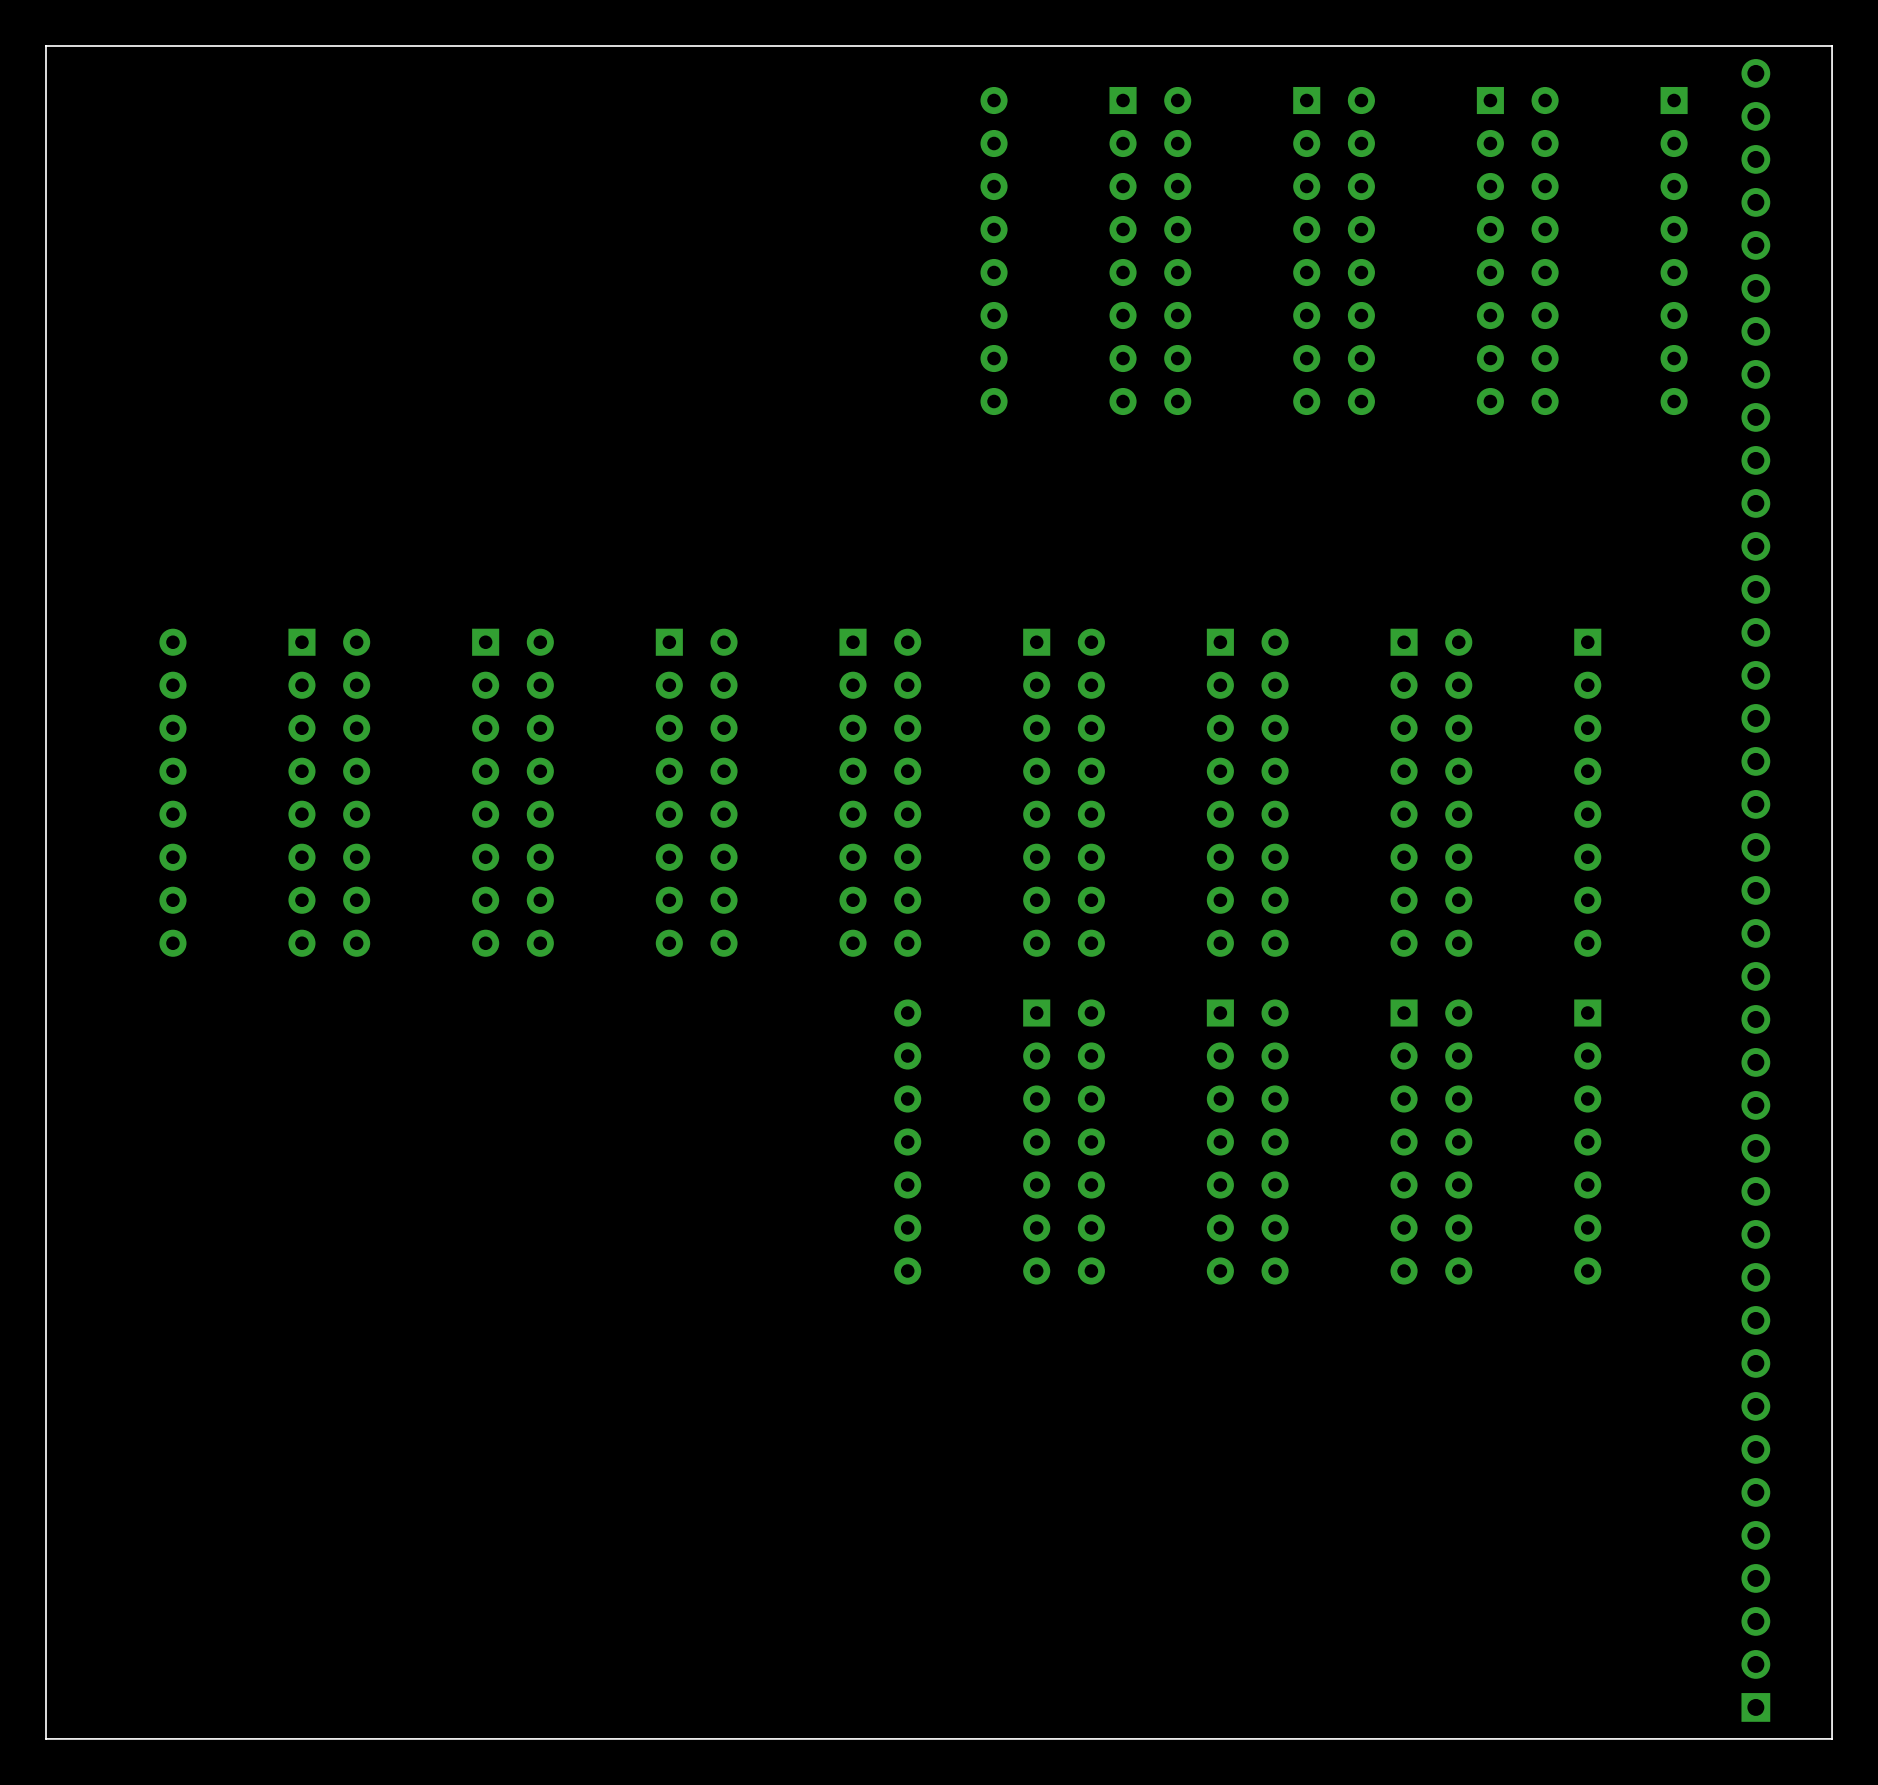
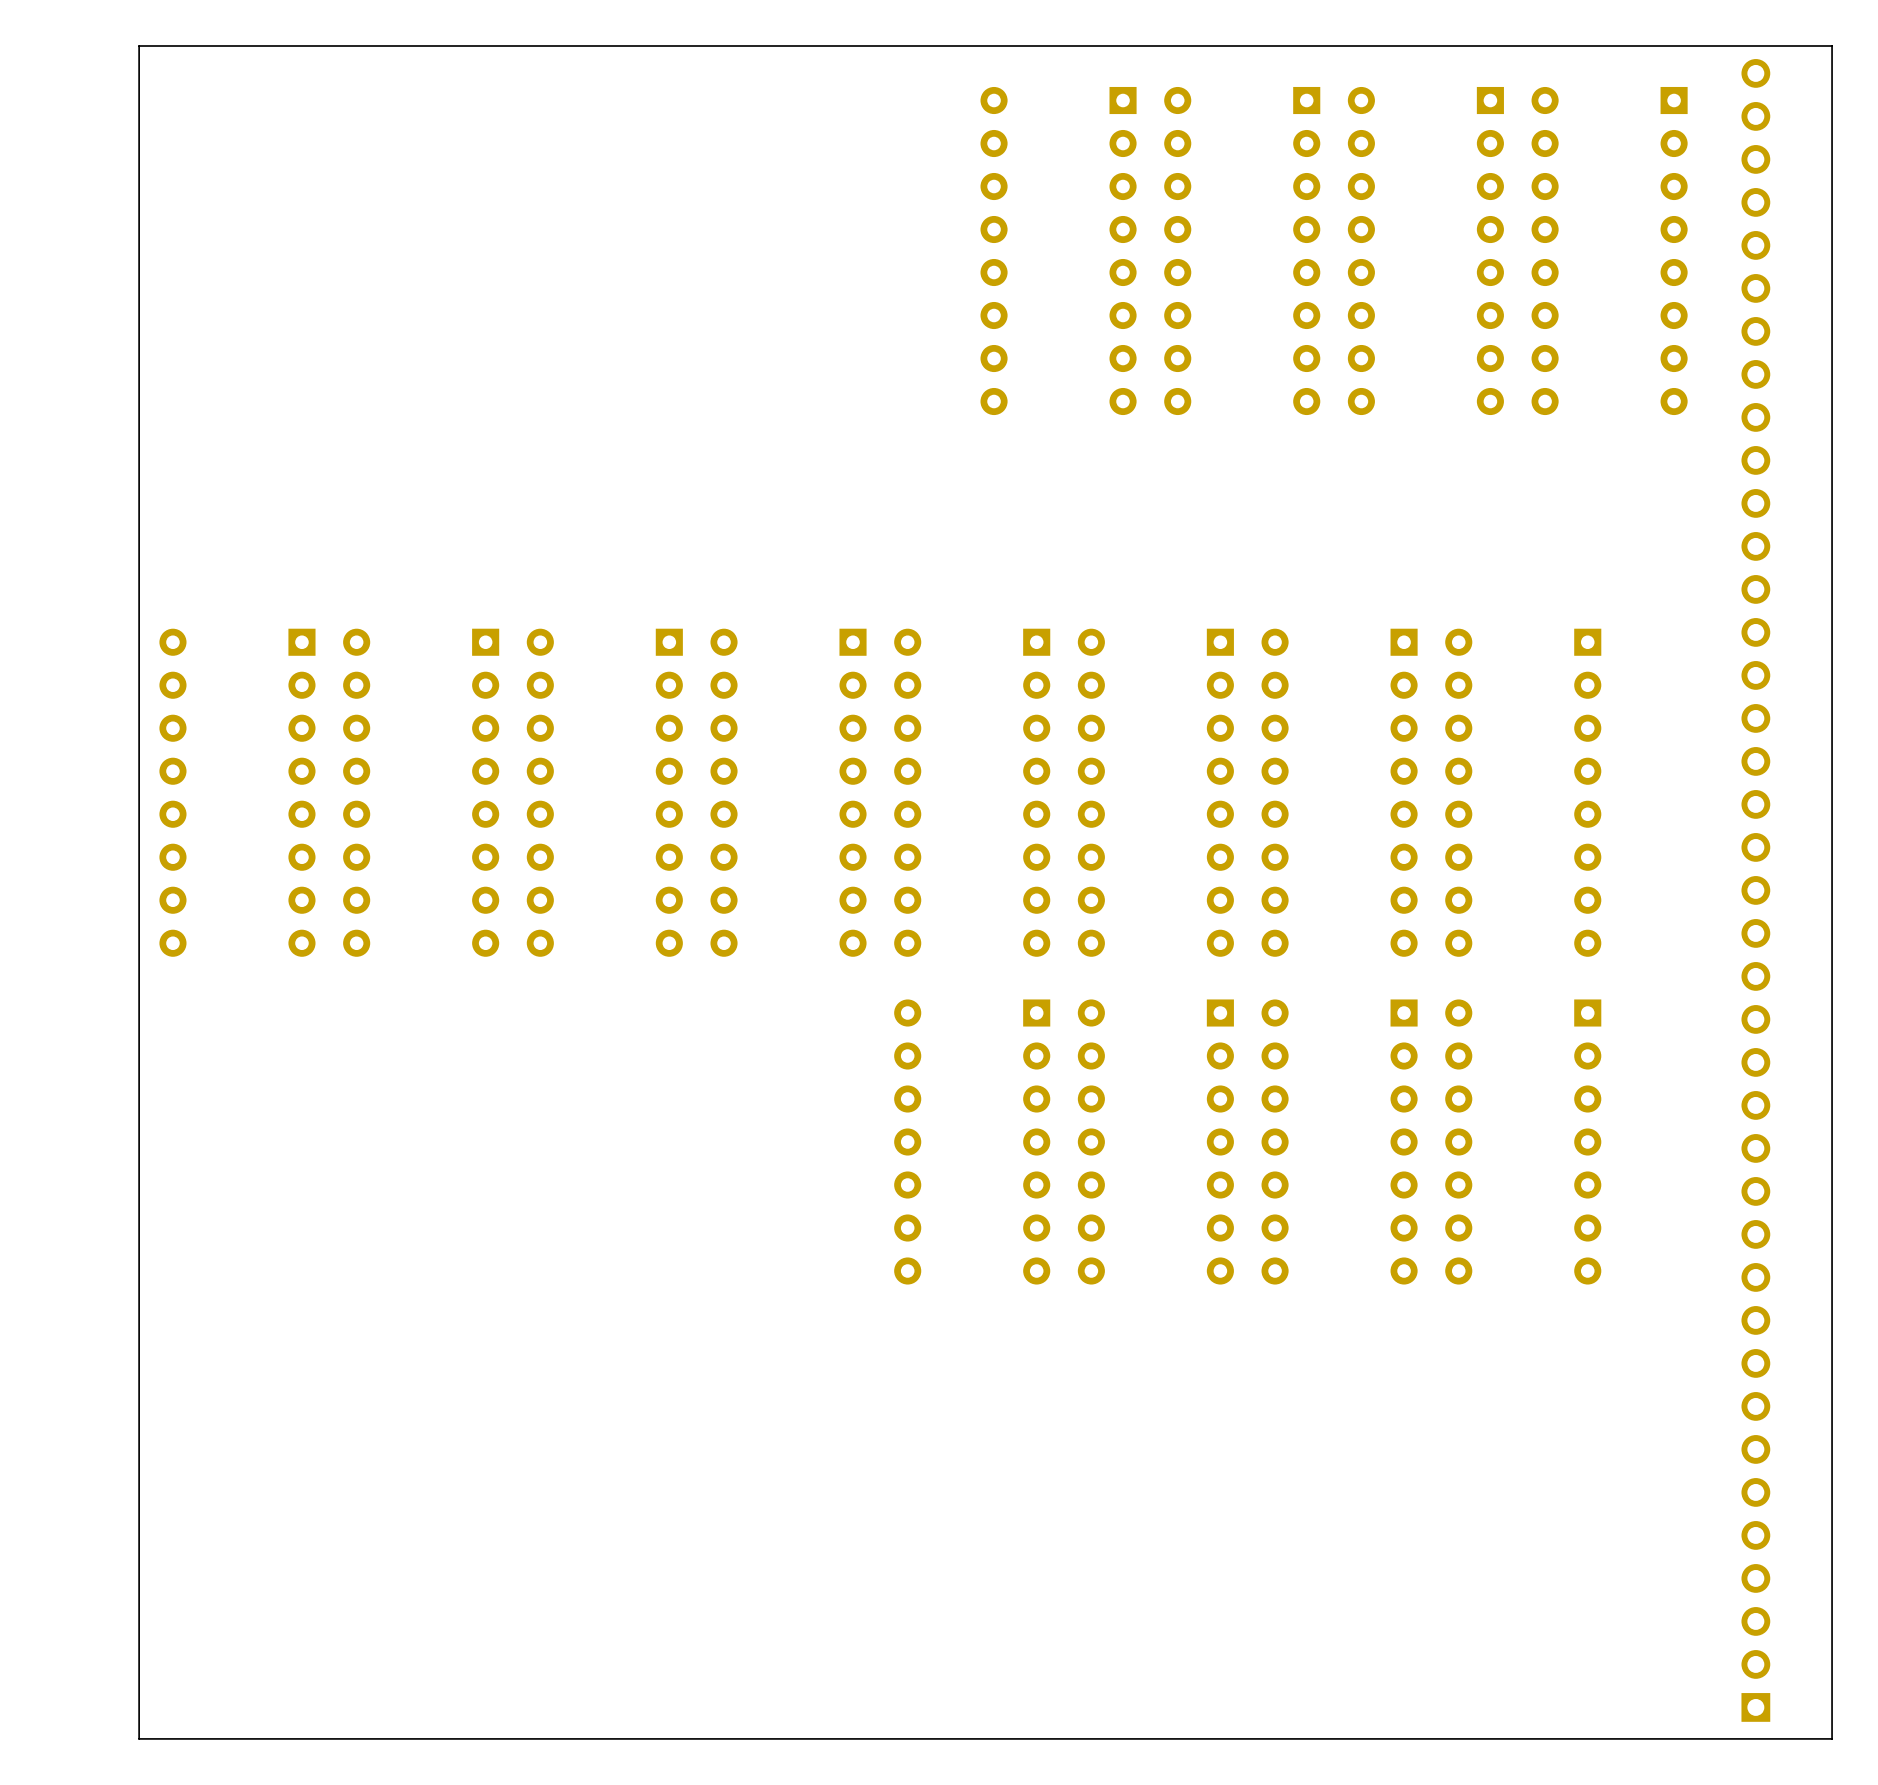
board edge: (139, 46) (46, 46) (46, 1738) (139, 1738) -> (139, 46) (139, 1738)

